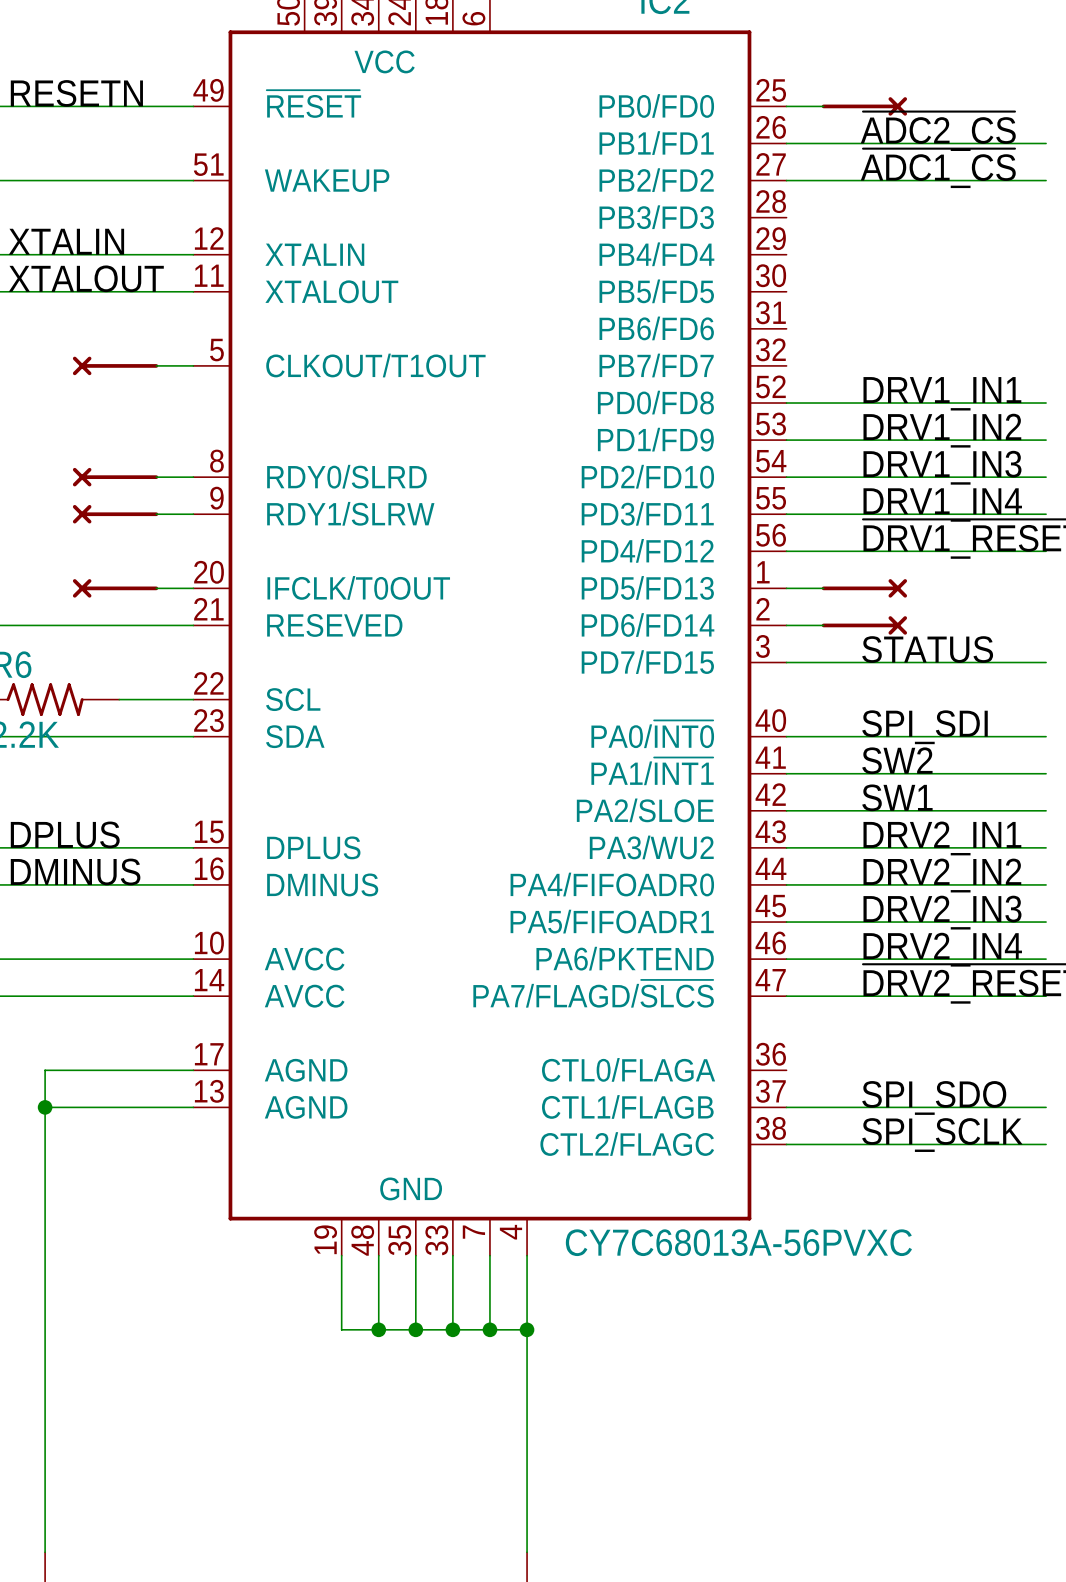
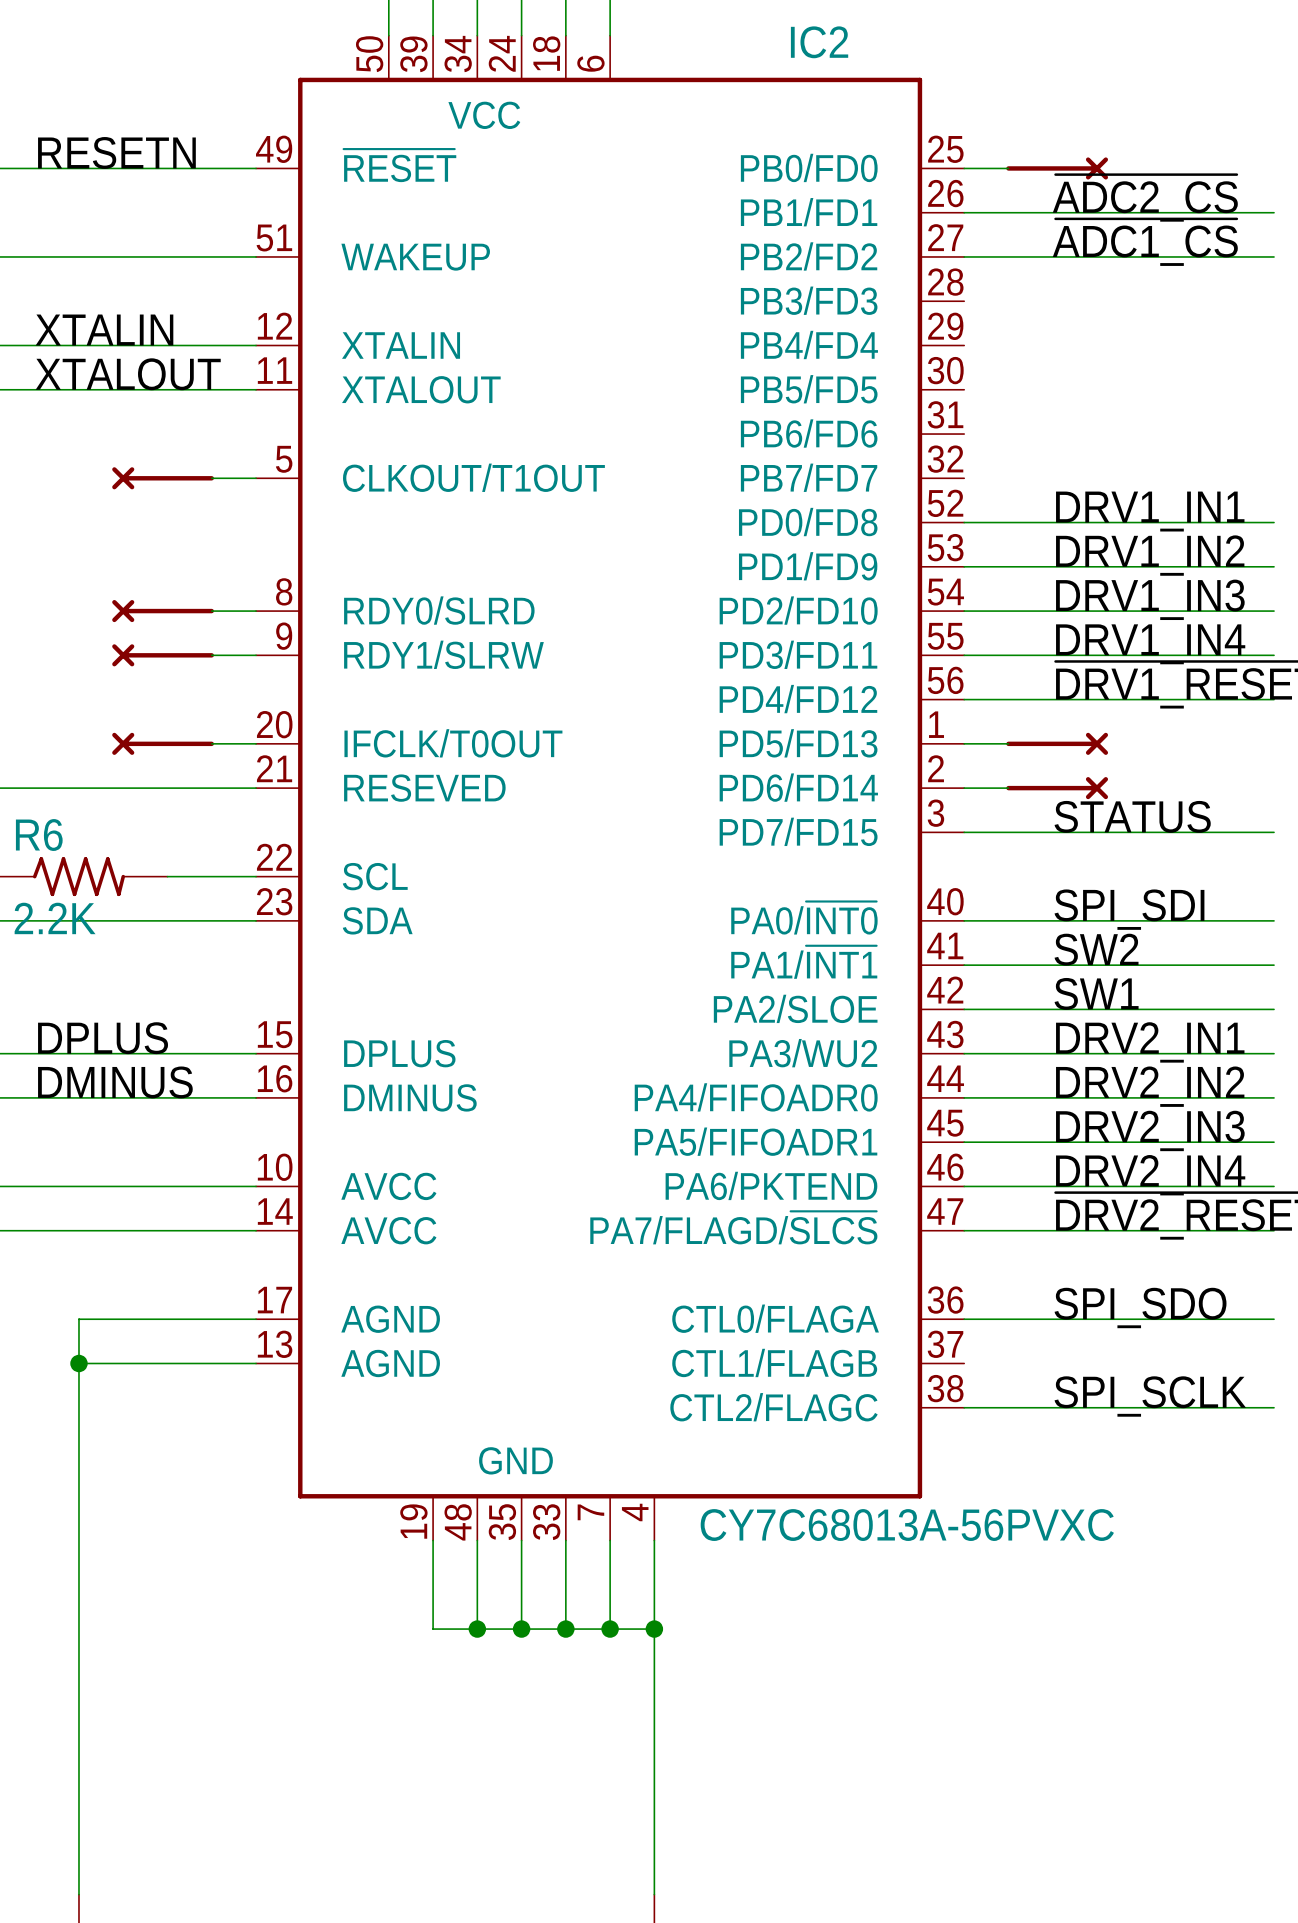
label position: SPI_SDO (934, 1097) -> SPI_SDO (1140, 1307)
wire: (786, 1107) (1046, 1107) -> (964, 1319) (1274, 1319)

